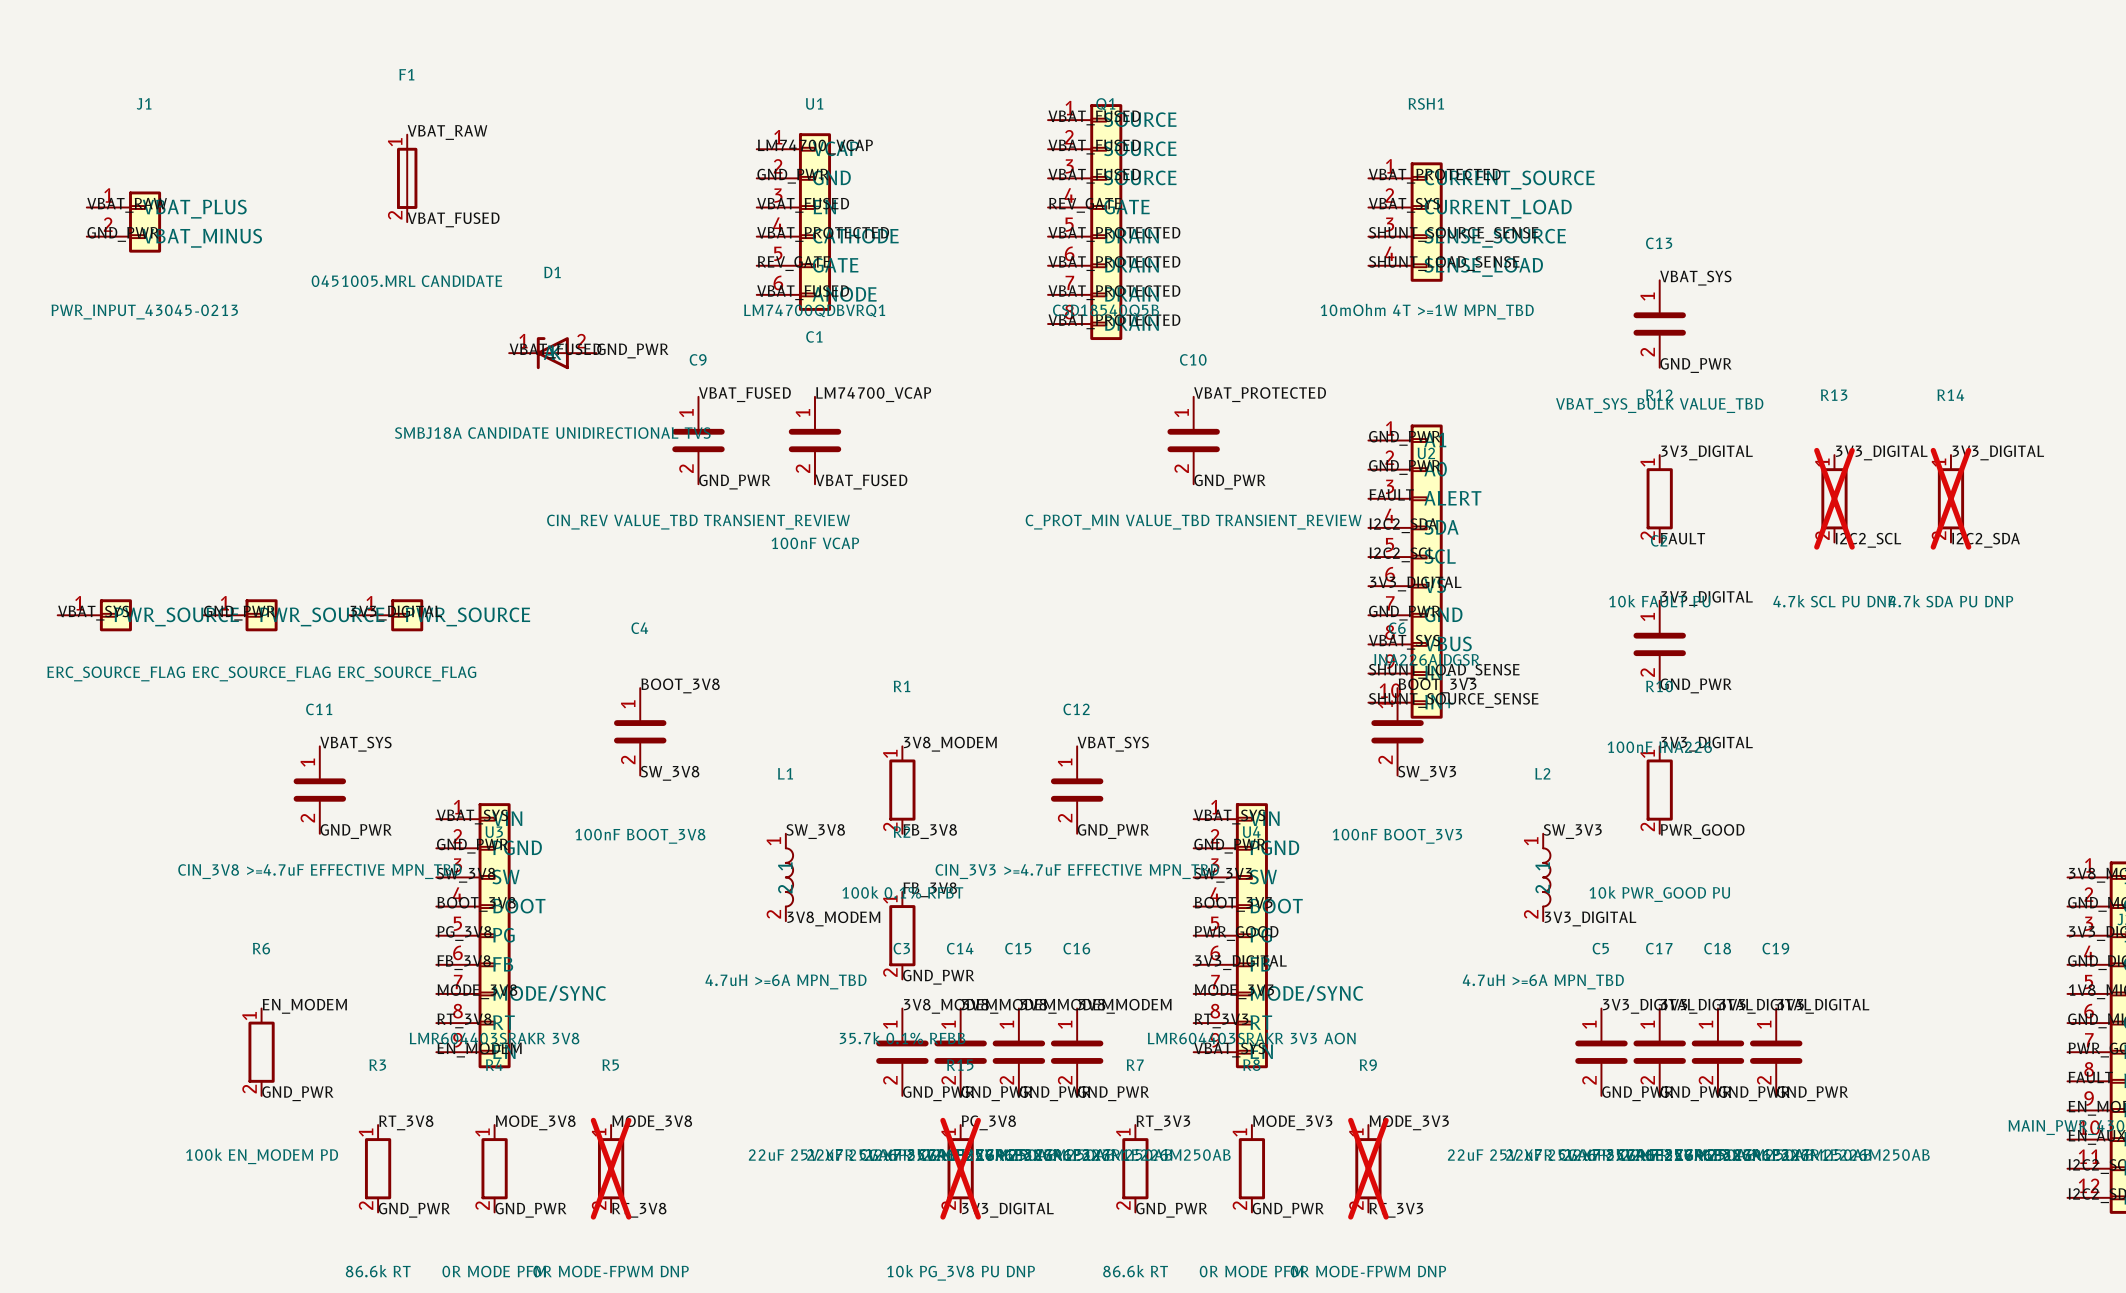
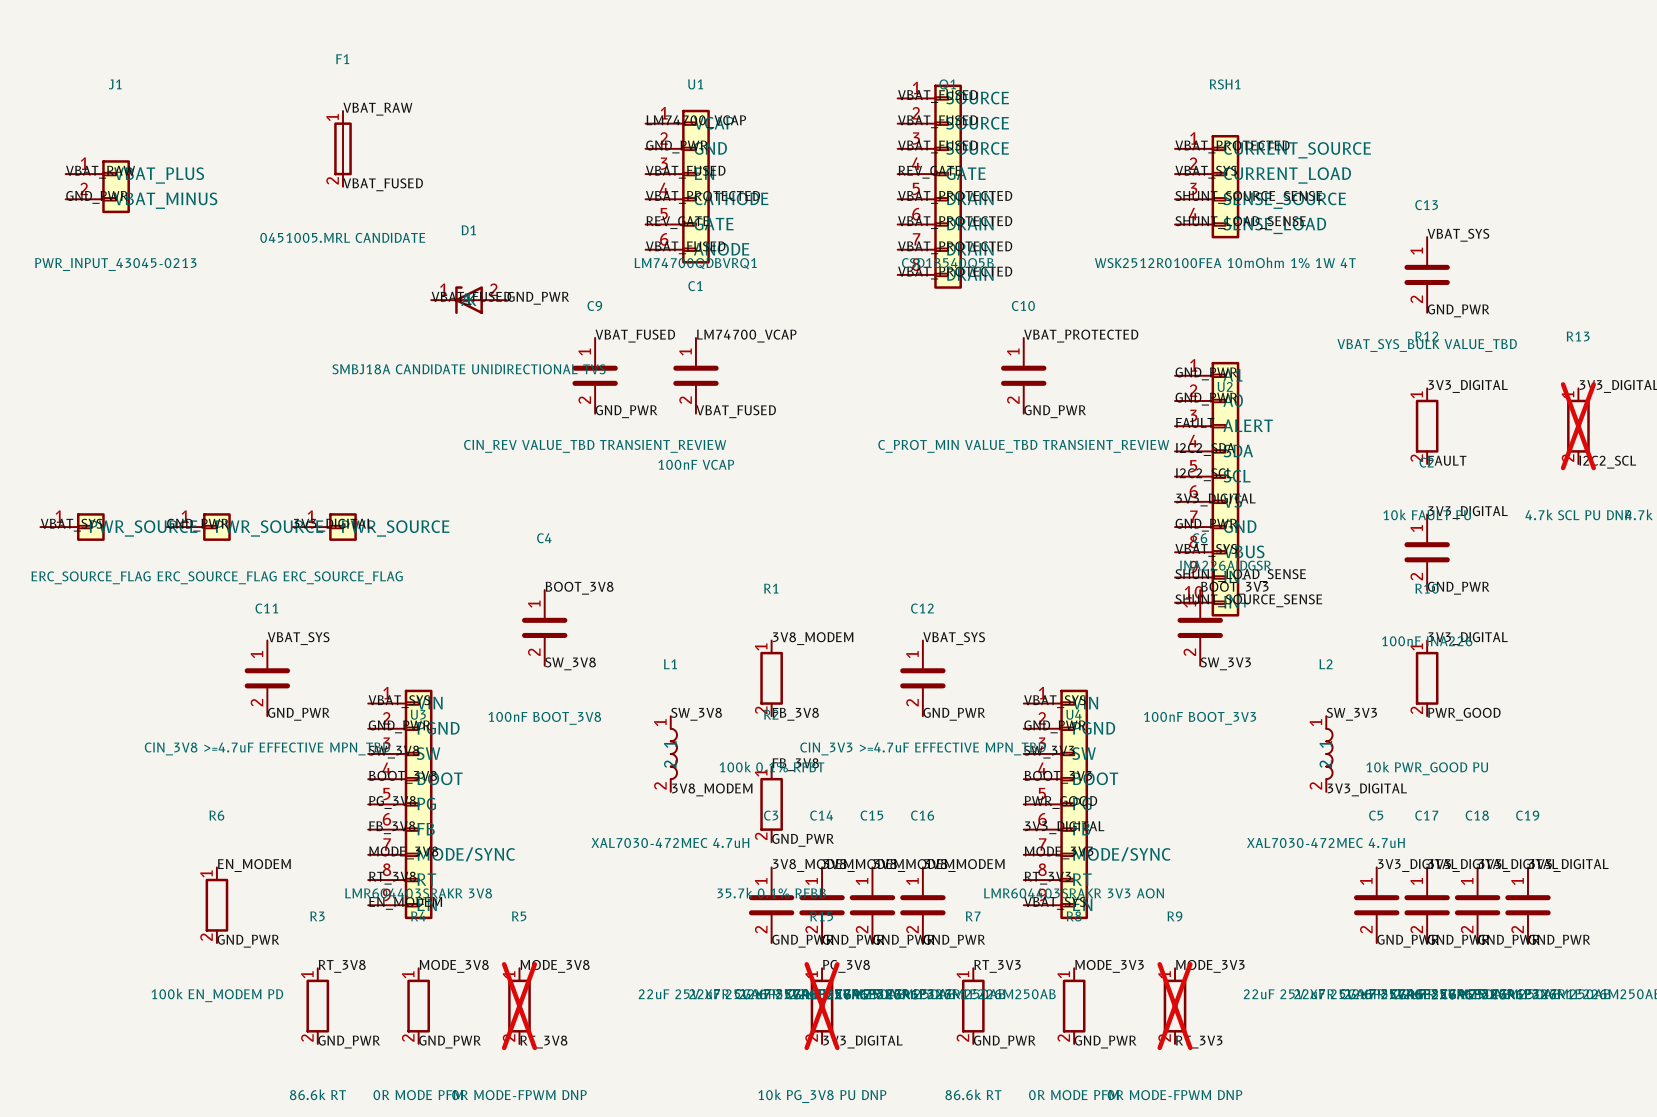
RSH1 value: 10mOhm 4T >=1W MPN_TBD (1427, 311) -> WSK2512R0100FEA 10mOhm 1% 1W 4T (1225, 262)
L1 value: 4.7uH >=6A MPN_TBD (786, 981) -> XAL7030-472MEC 4.7uH (670, 842)
L2 value: 4.7uH >=6A MPN_TBD (1543, 981) -> XAL7030-472MEC 4.7uH (1325, 842)

